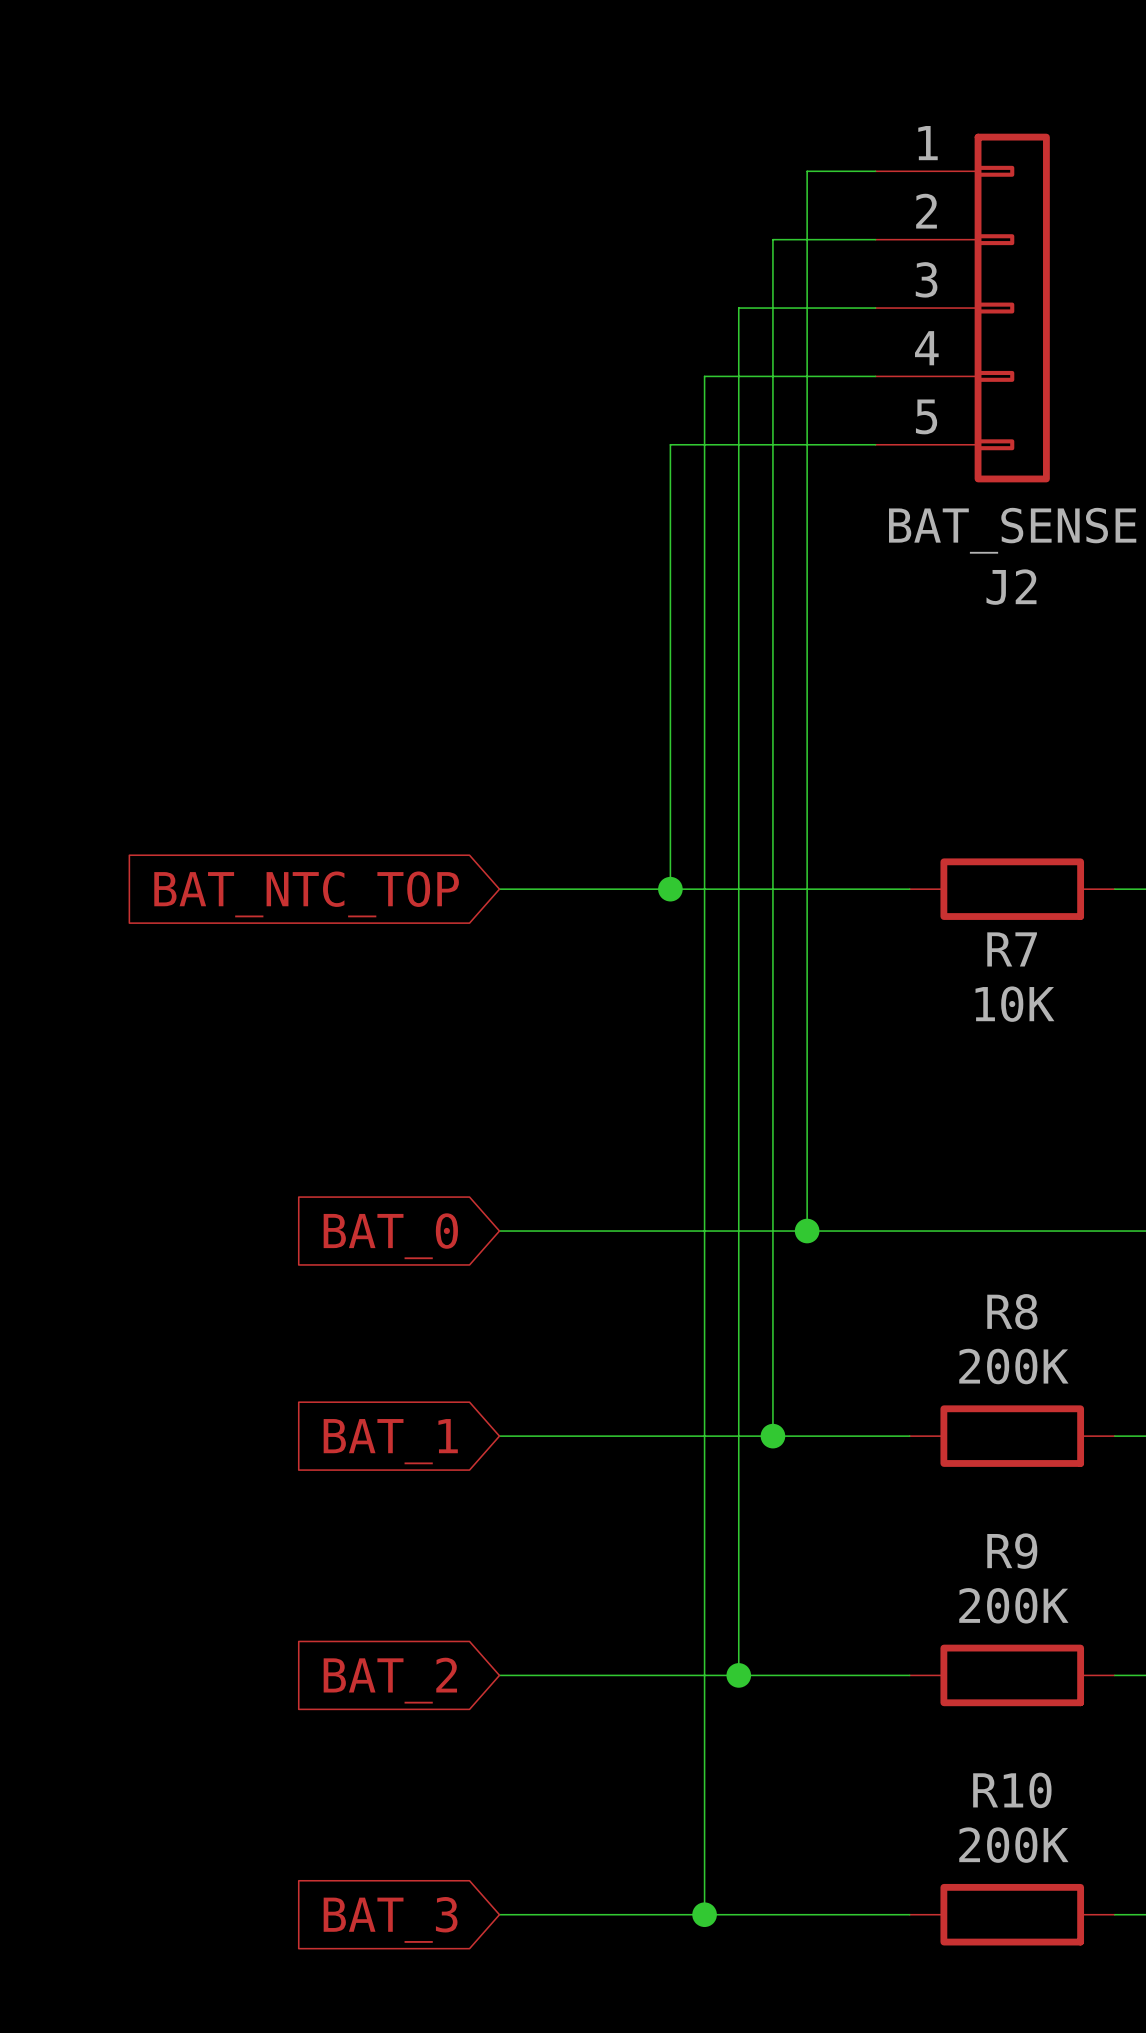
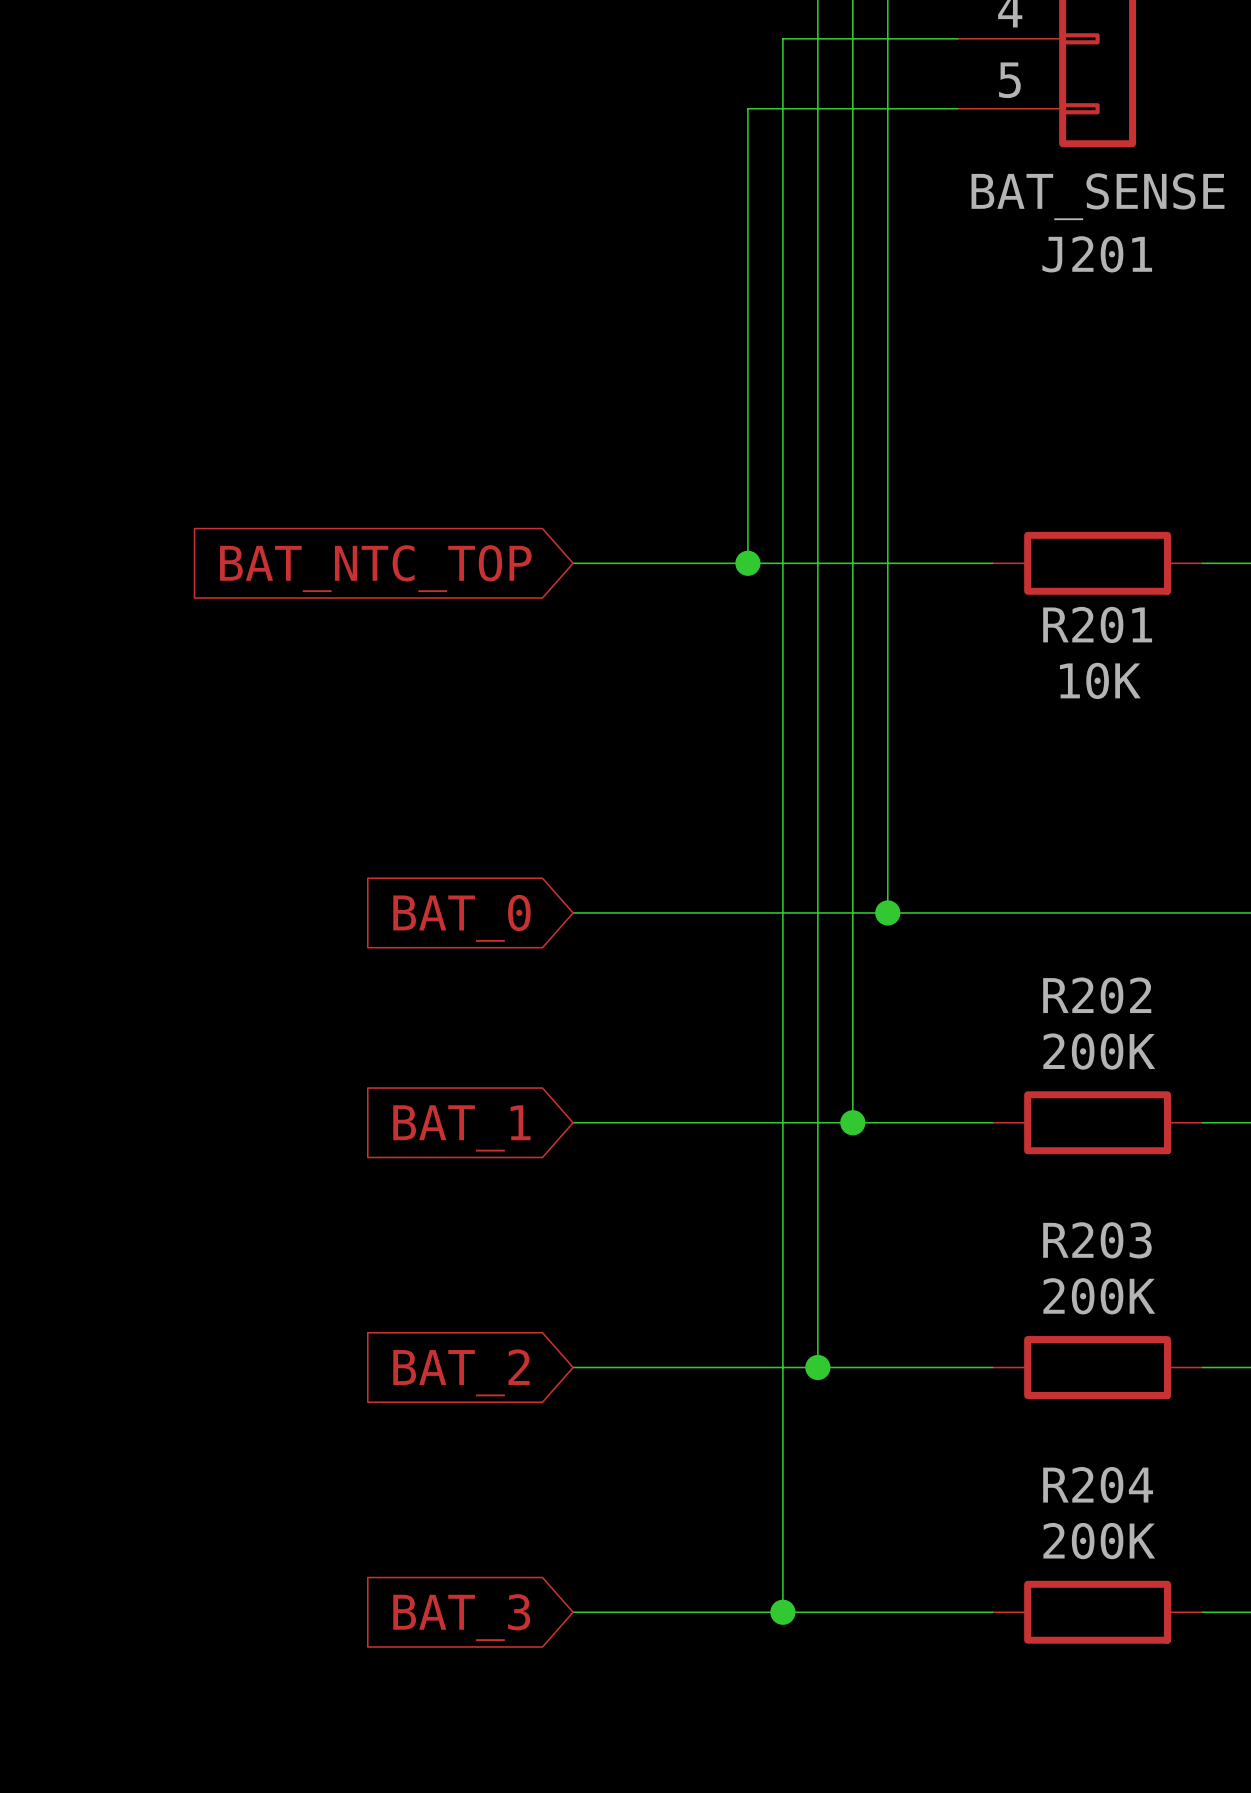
J2 name: J2 (1011, 587) -> J201 (1097, 254)
R7 name: R7 (1012, 949) -> R201 (1097, 624)
R8 name: R8 (1012, 1311) -> R202 (1097, 995)
R9 name: R9 (1012, 1551) -> R203 (1097, 1240)
R10 name: R10 (1012, 1790) -> R204 (1098, 1485)

